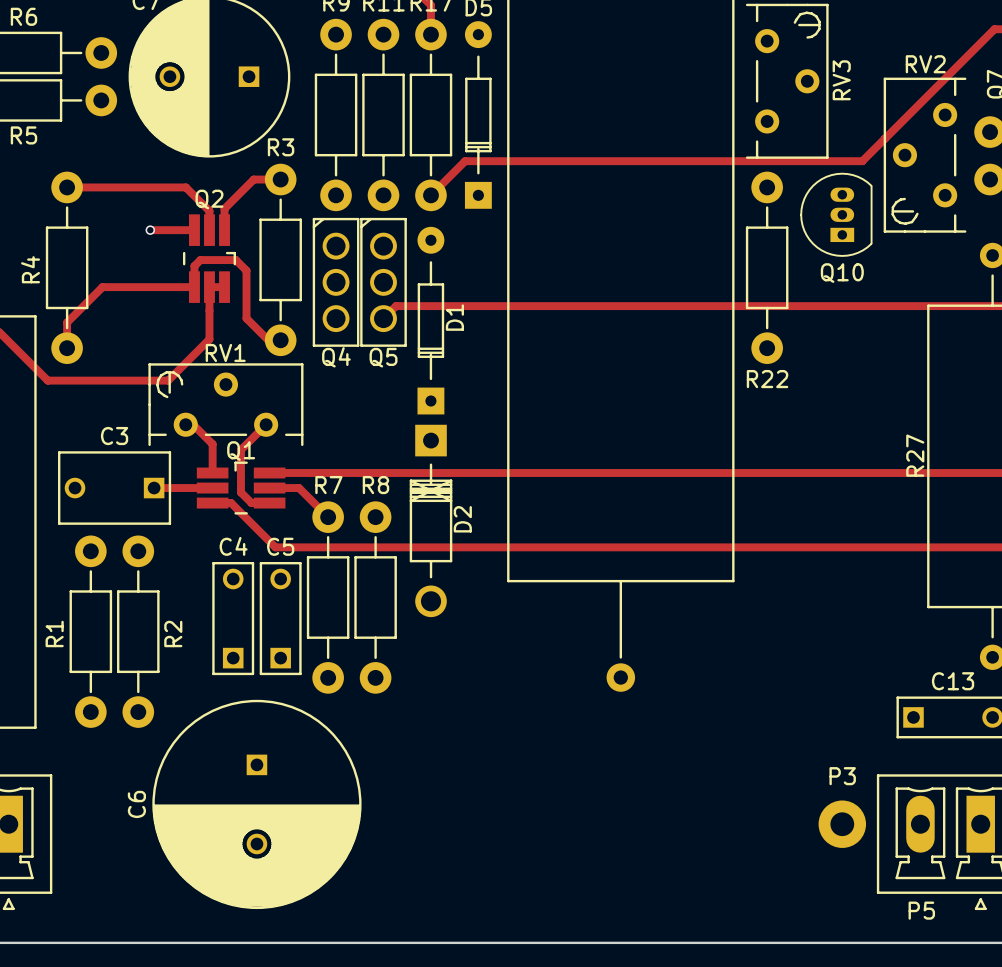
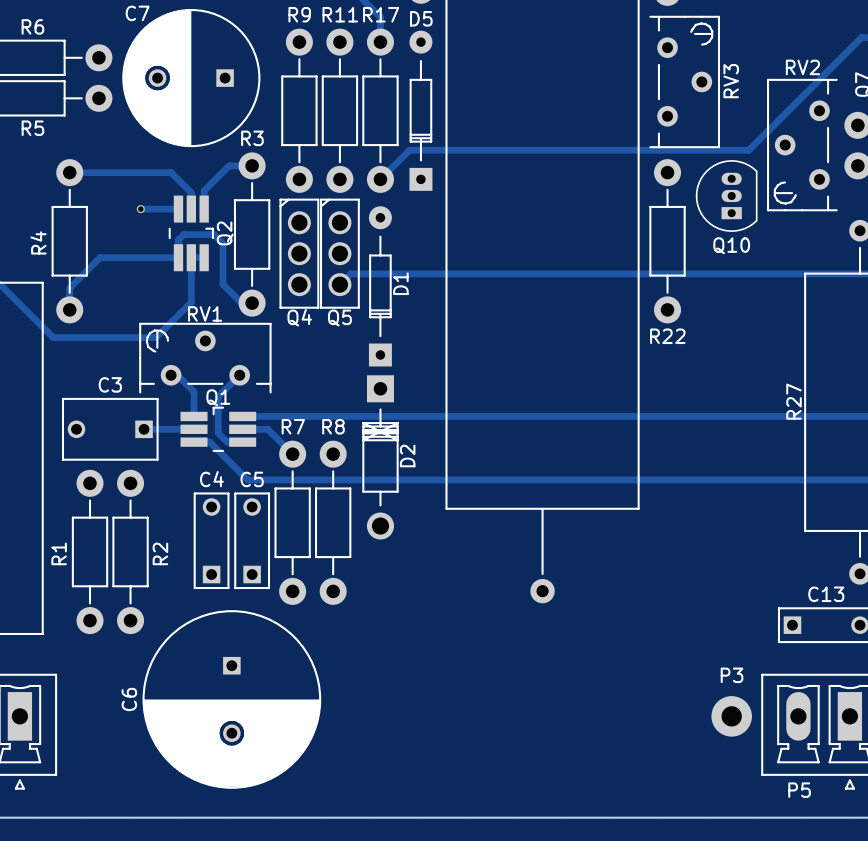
Q2 name rotation: 0° (209, 199) -> 90° counterclockwise (225, 233)
Q2 name position: Q2 (209, 199) -> Q2 (225, 233)

